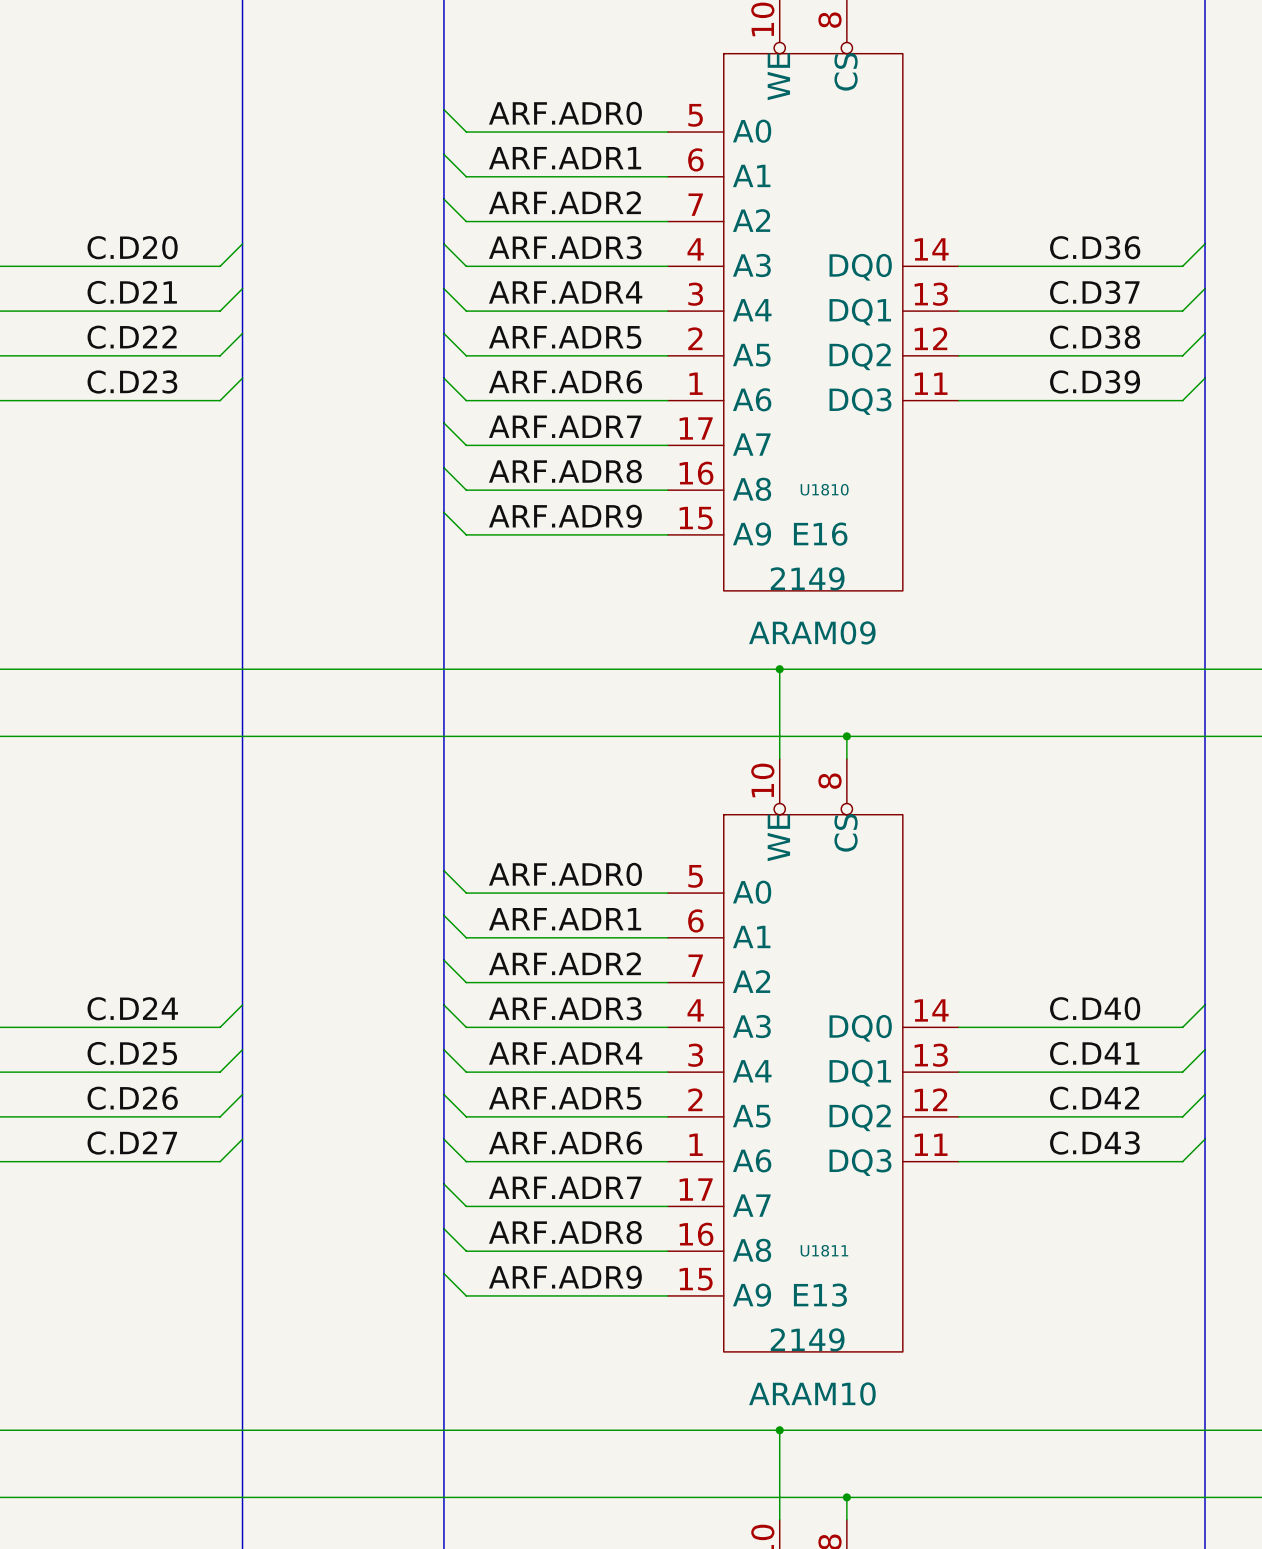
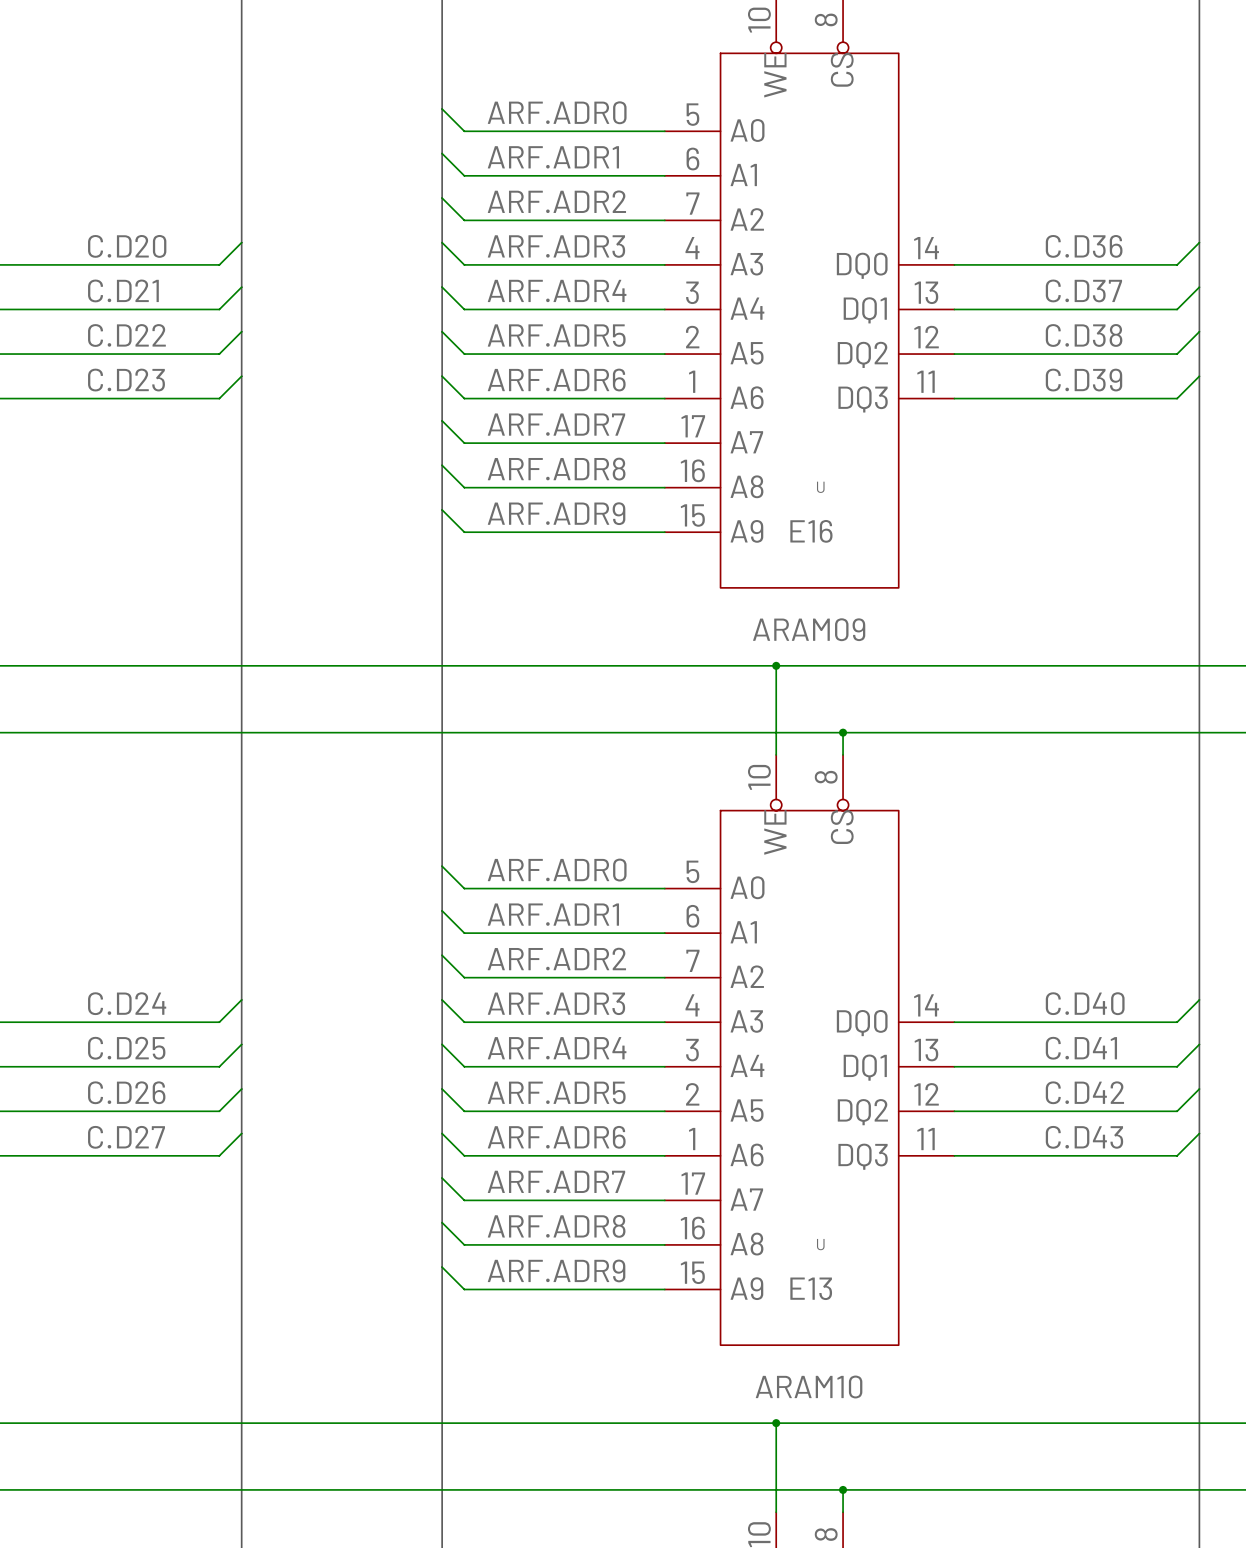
U1810 name: U1810 (824, 489) -> U (820, 487)
U1810 value: 2149 (807, 578) -> none
U1811 name: U1811 (824, 1250) -> U (820, 1244)
U1811 value: 2149 (807, 1339) -> none

